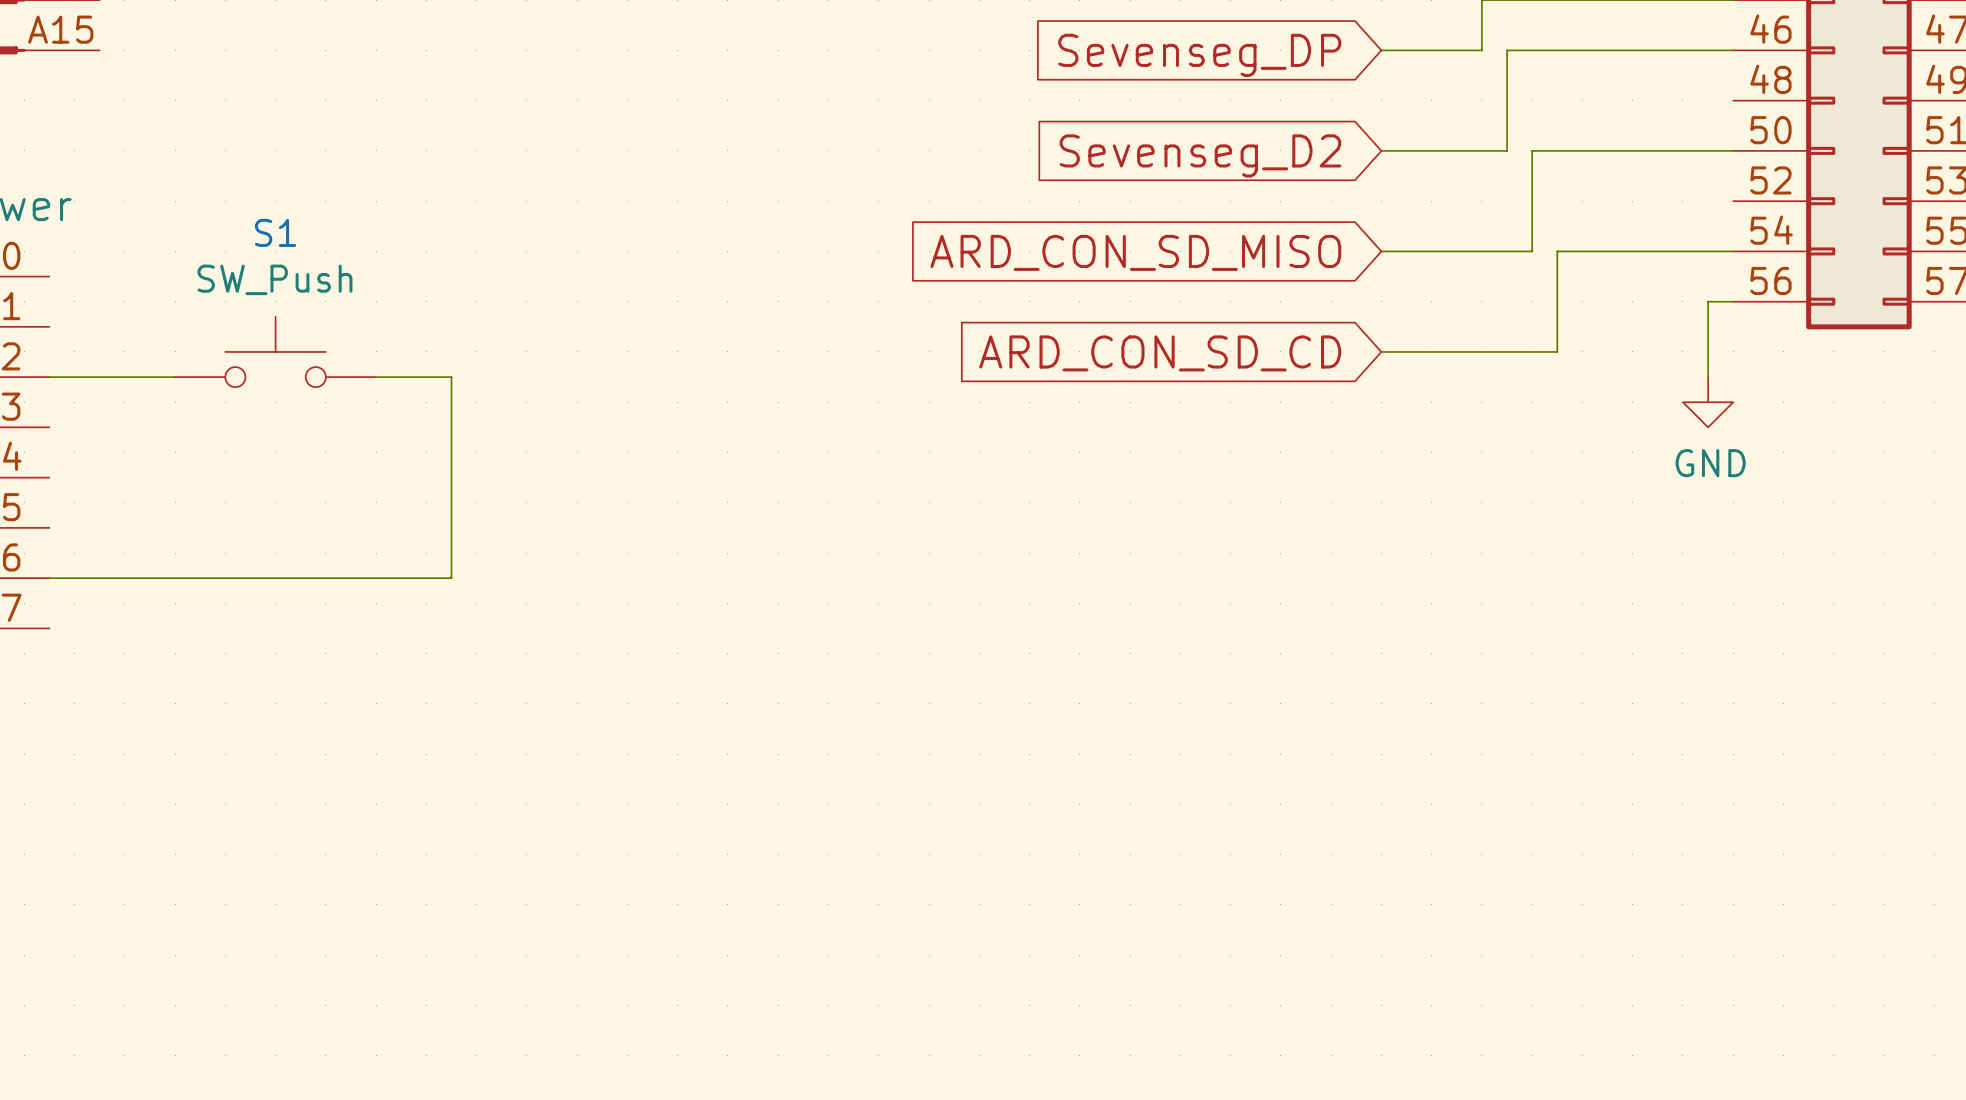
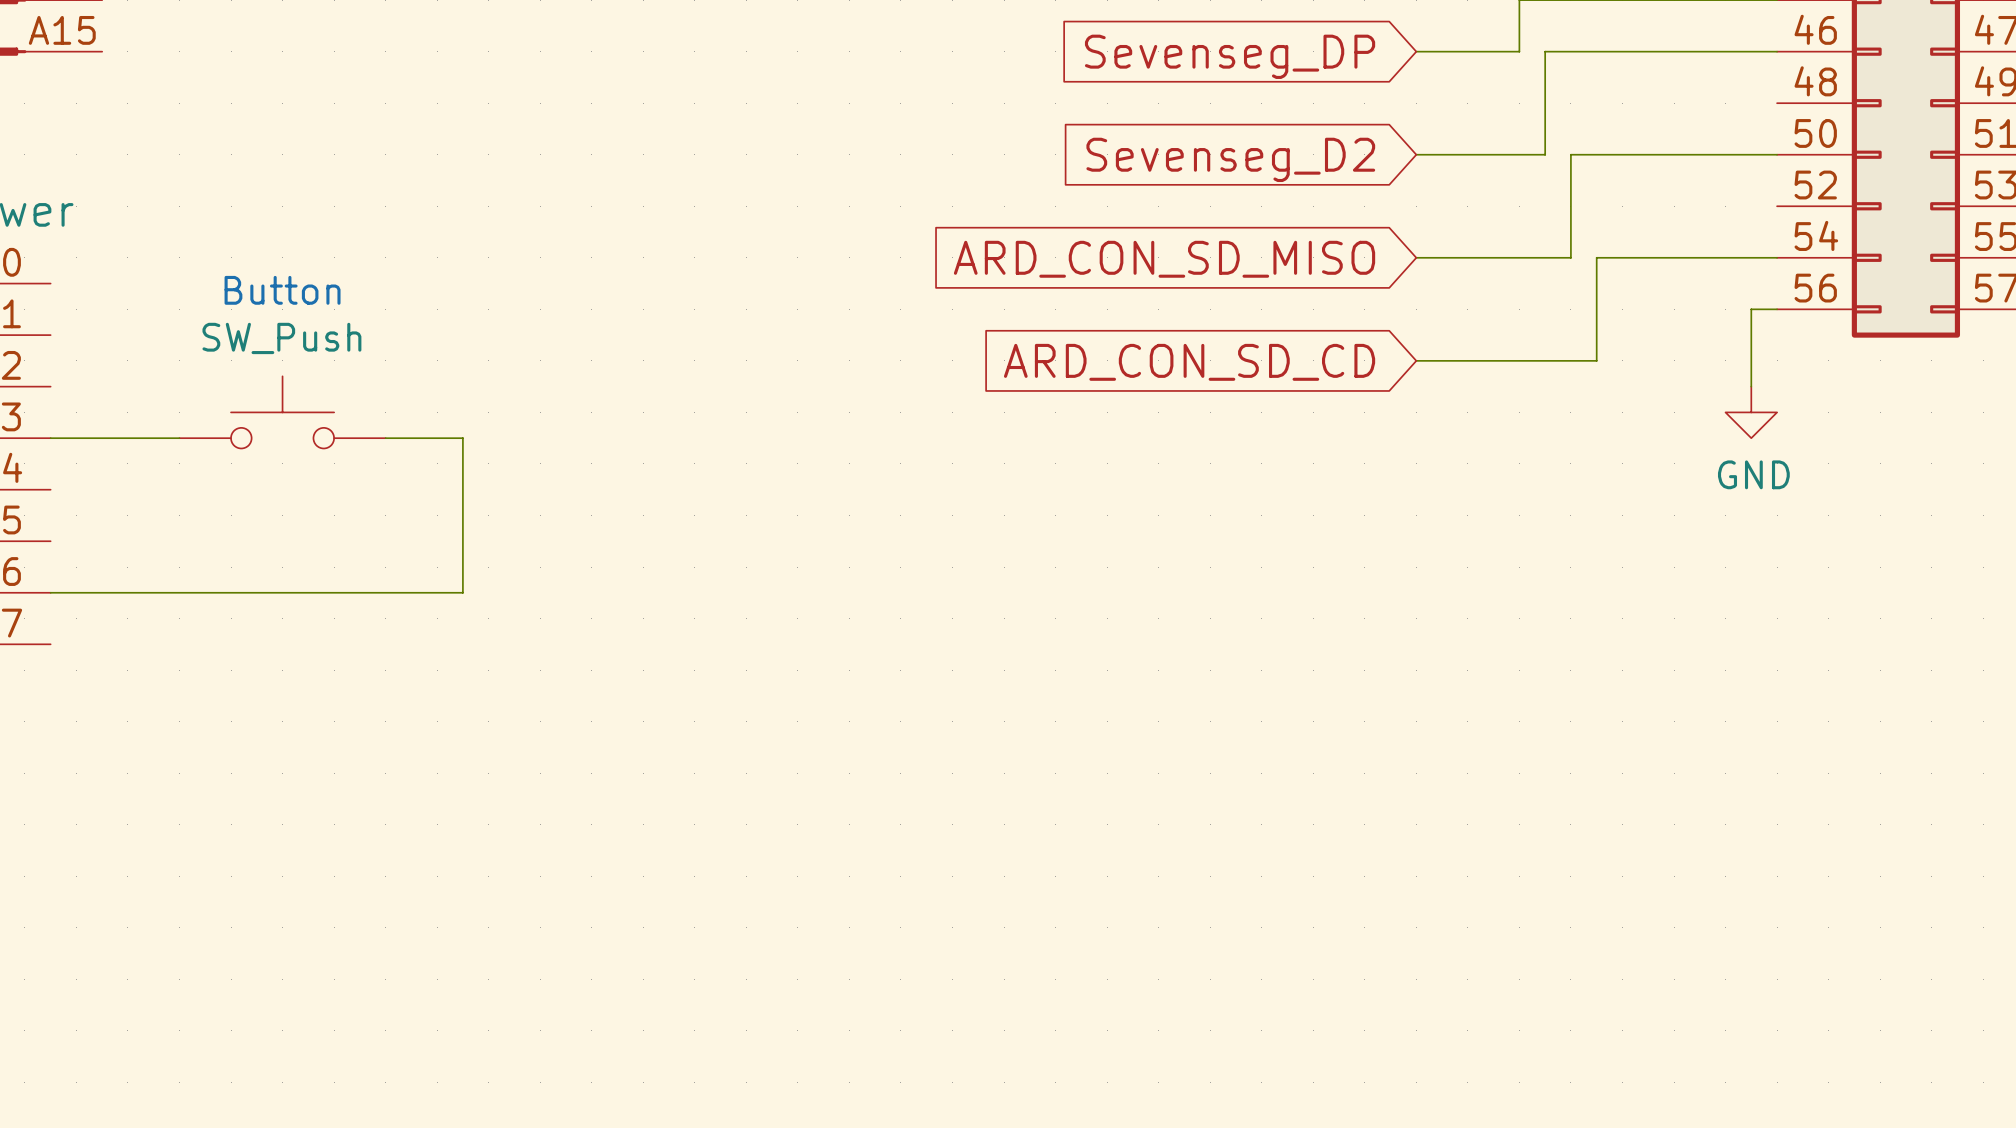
S1: SW_Push (275, 351) -> none
wire: (49, 377) (175, 377) -> (50, 438) (179, 438)
wire: (376, 377) (451, 377) (451, 427) -> (385, 438) (462, 438)
Button: none -> SW_Push (282, 412)

